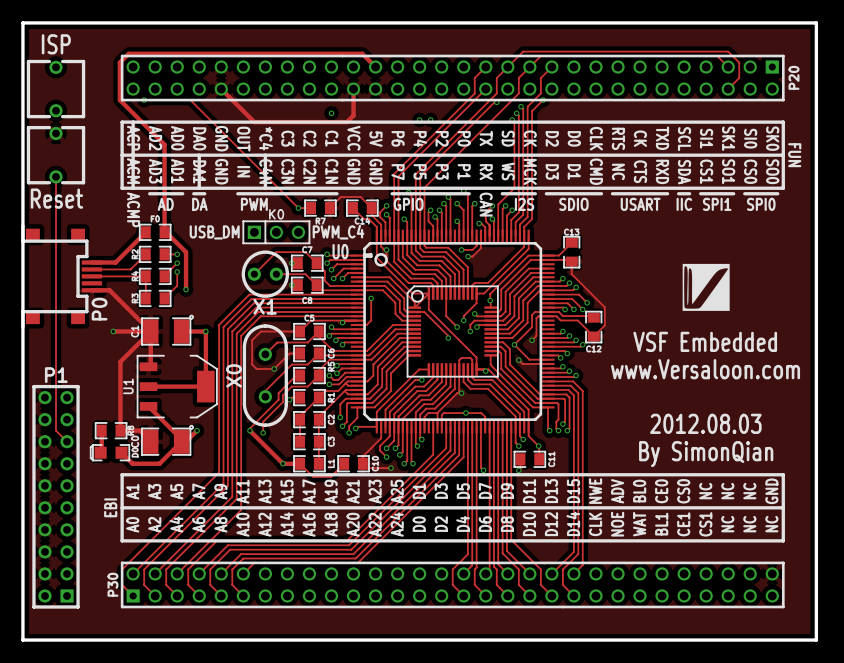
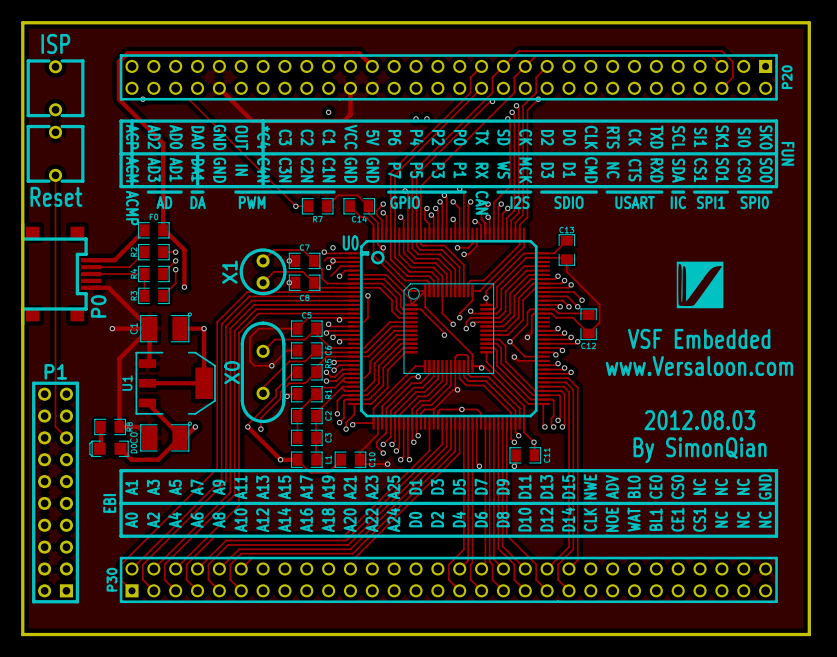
line: none -> (263, 121) (263, 153)
text: USB_DM (214, 232) -> none
K0: (276, 232) -> none
text: PWM_C4 (338, 232) -> none
via: none -> (333, 247)
U0 name position: U0 (340, 251) -> U0 (350, 242)
track: (265, 263) (254, 274) -> (274, 271) (263, 282)
via: (327, 263) -> none
via: none -> (333, 260)
X1 rotation: 0° (265, 274) -> 90° clockwise (263, 271)
via: (333, 278) -> none

